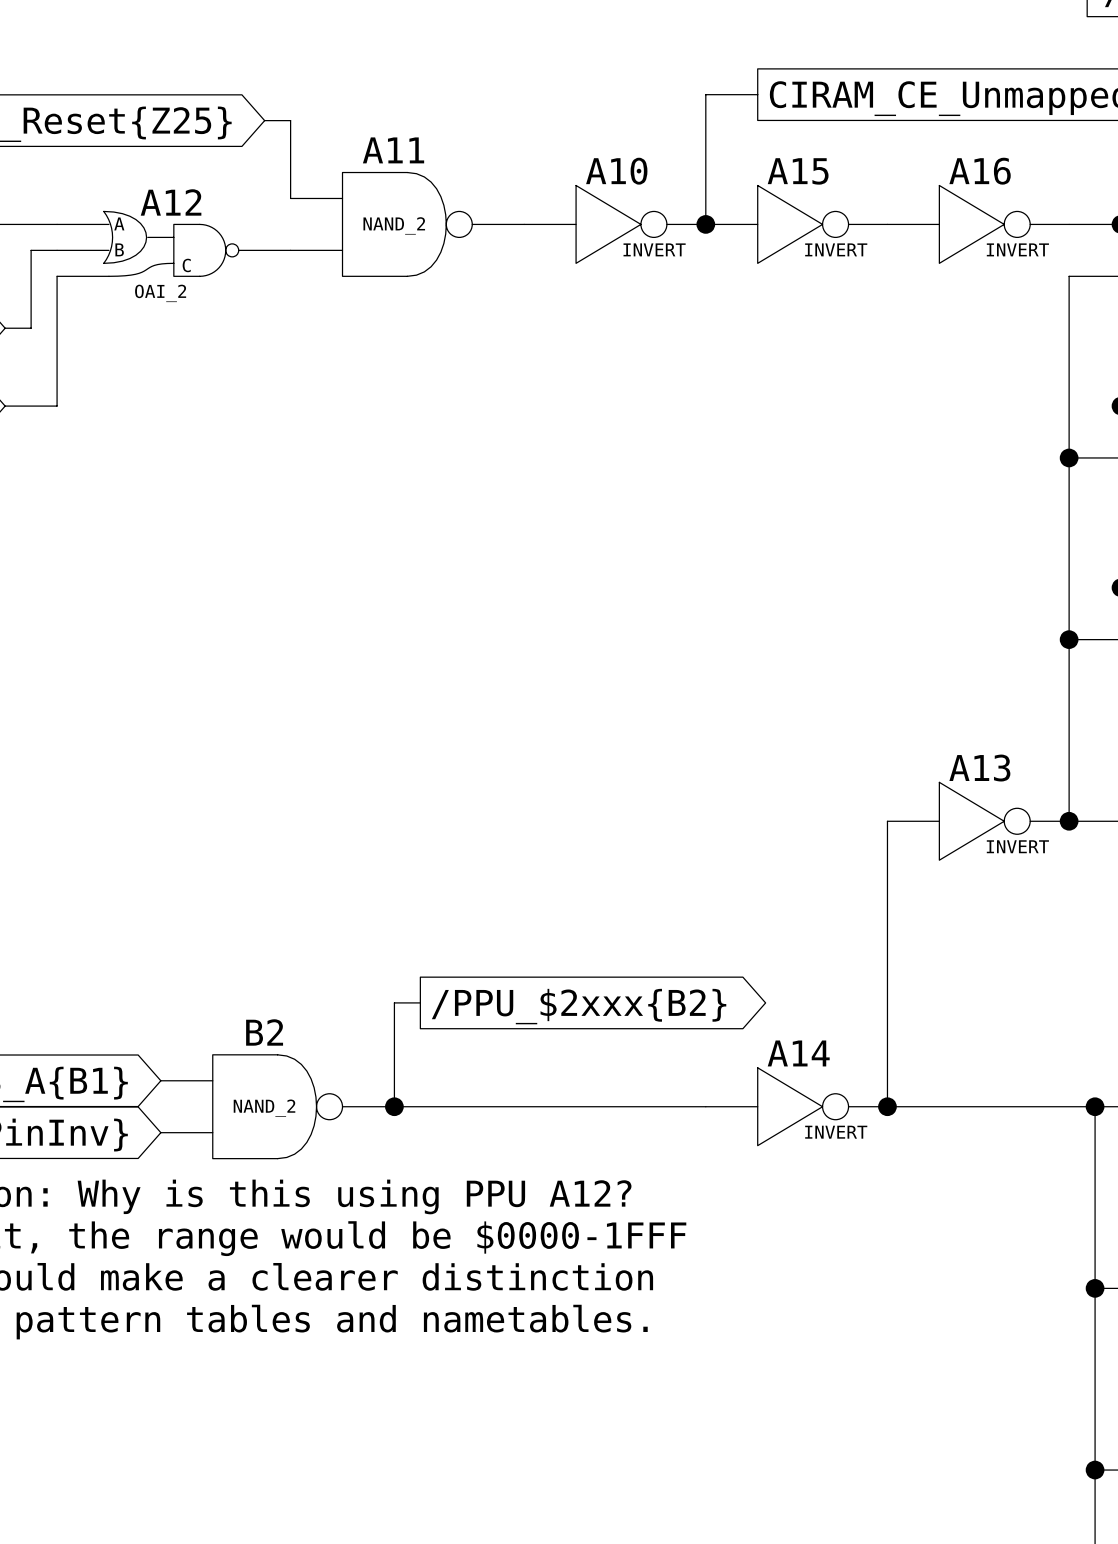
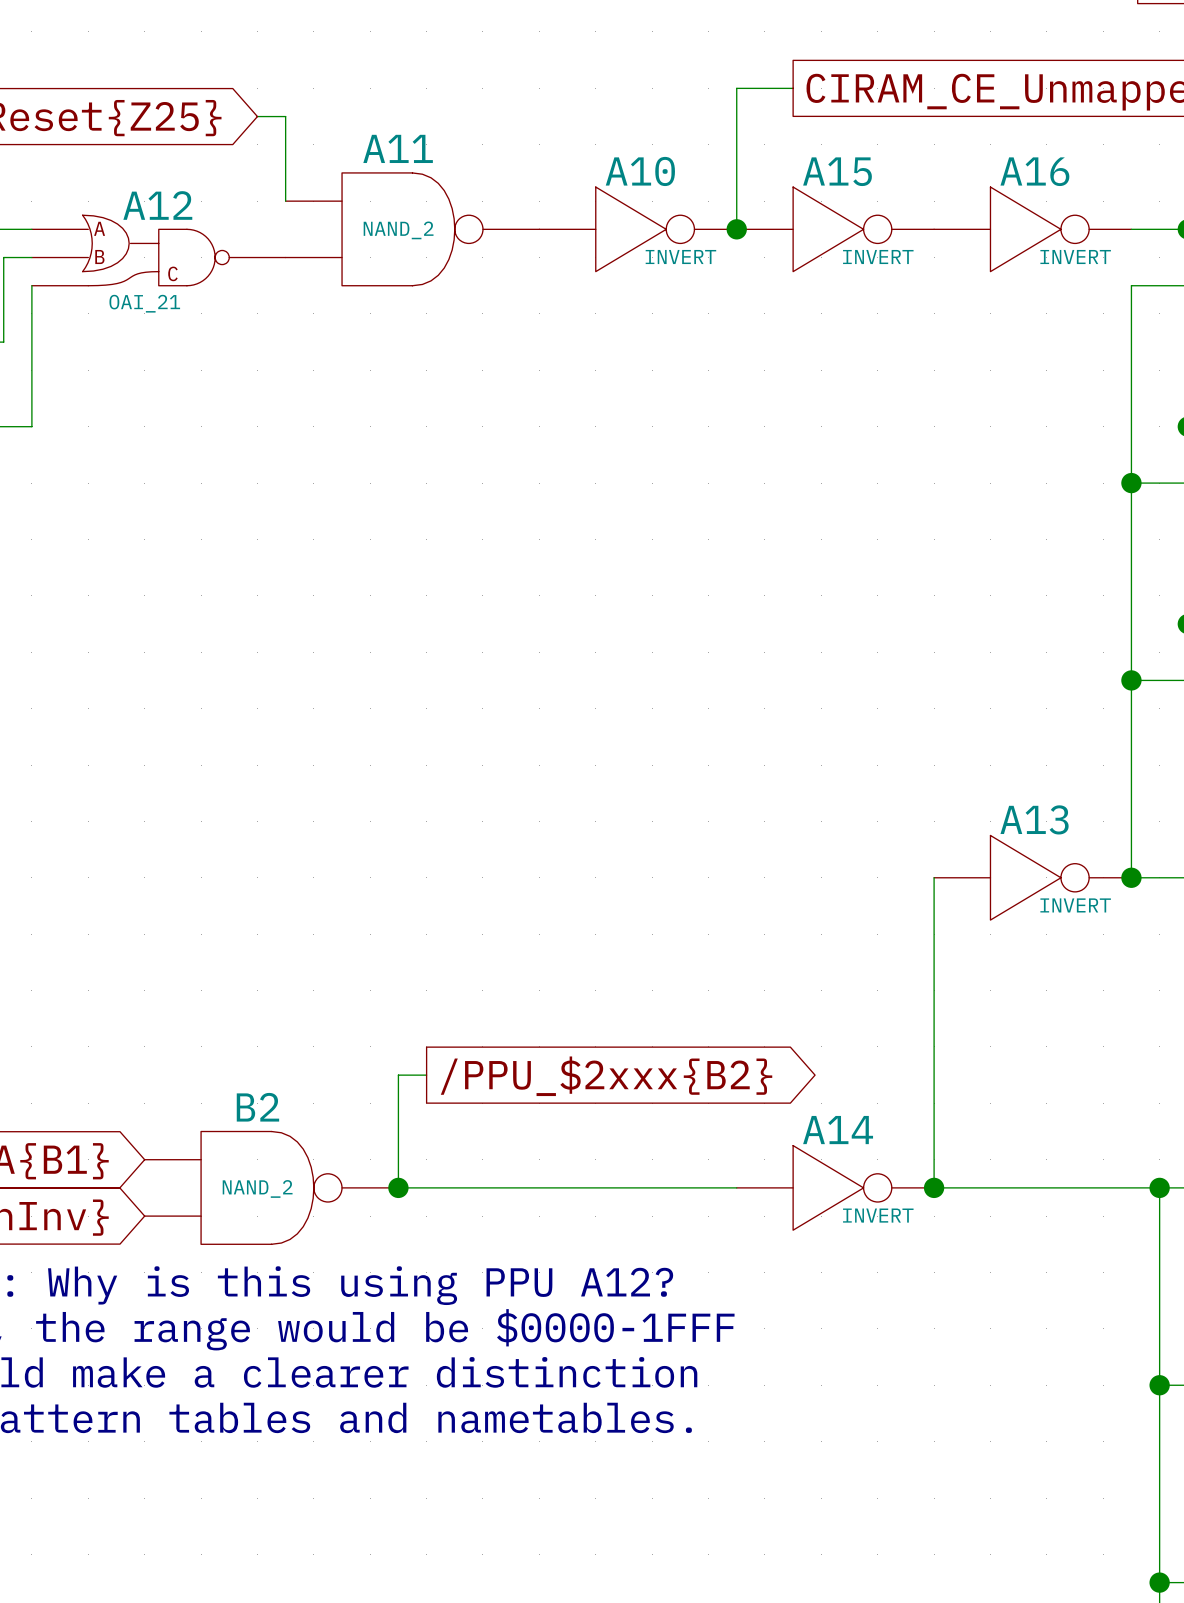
A12 value: OAI_2 (160, 293) -> OAI_21 (144, 303)

